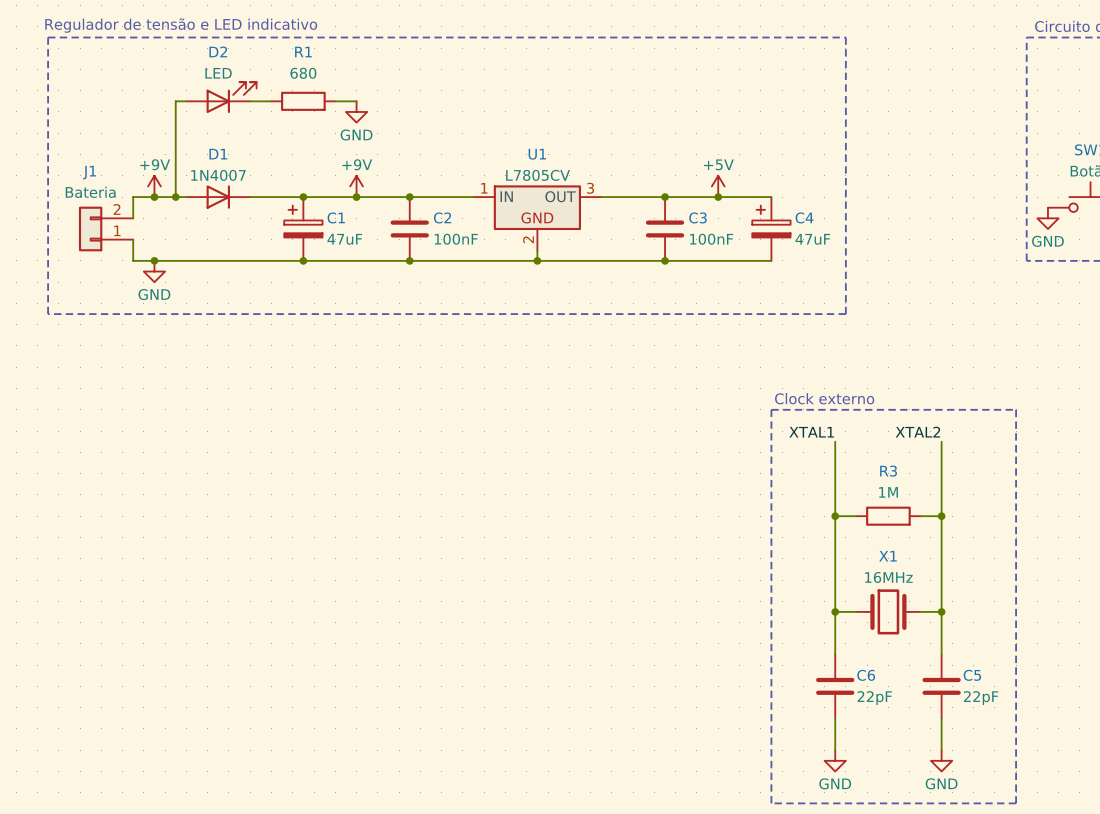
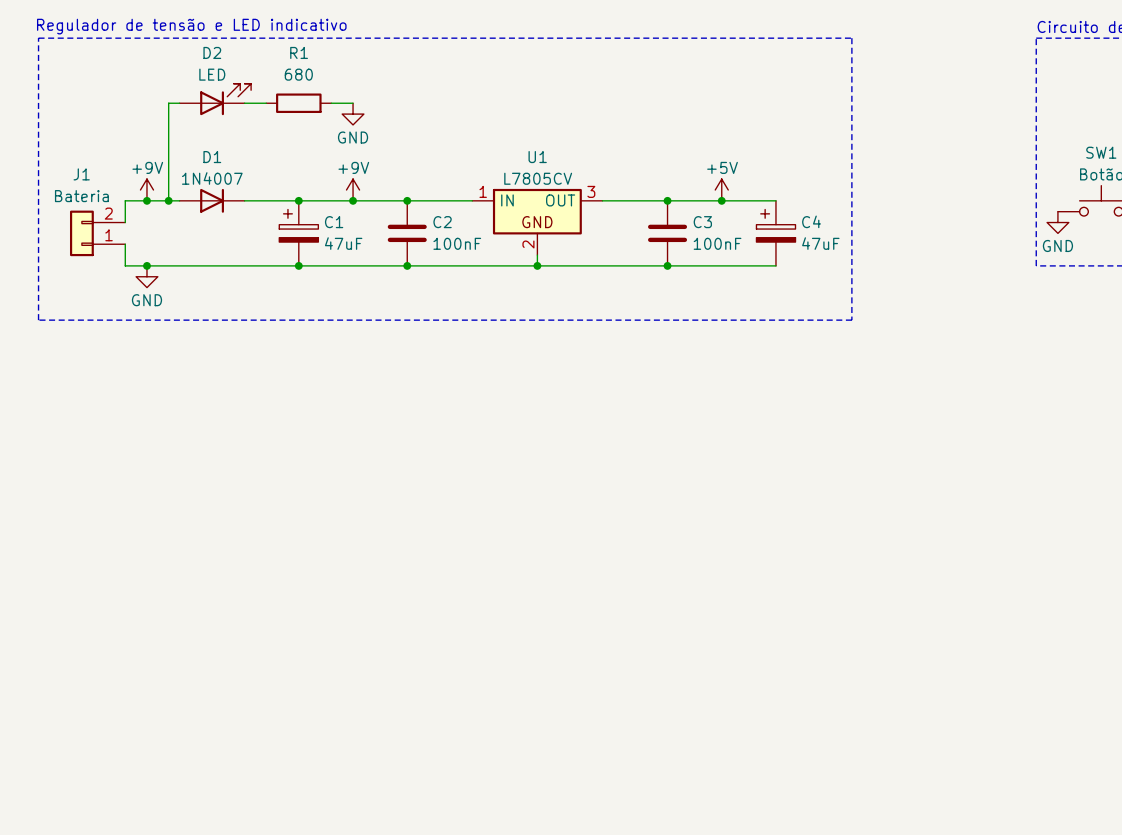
text: Clock externo (824, 398) -> none
line: (771, 409) (1016, 409) (1016, 803) (771, 803) (771, 409) -> none
label: XTAL1 (811, 432) -> none
label: XTAL2 (917, 432) -> none
wire: (835, 441) (835, 654) -> none
wire: (941, 441) (941, 654) -> none
wire: (835, 516) (856, 516) -> none
junction: (835, 516) -> none
R3: 1M (888, 516) -> none
wire: (920, 516) (941, 516) -> none
junction: (941, 516) -> none
wire: (835, 611) (856, 611) -> none
junction: (835, 611) -> none
X1: 16MHz (888, 611) -> none
wire: (920, 611) (941, 611) -> none
junction: (941, 611) -> none
C6: 22pF (835, 686) -> none
C5: 22pF (941, 686) -> none
wire: (835, 718) (835, 750) -> none
wire: (941, 718) (941, 750) -> none
power symbol: GND (835, 760) -> none
power symbol: GND (941, 760) -> none

